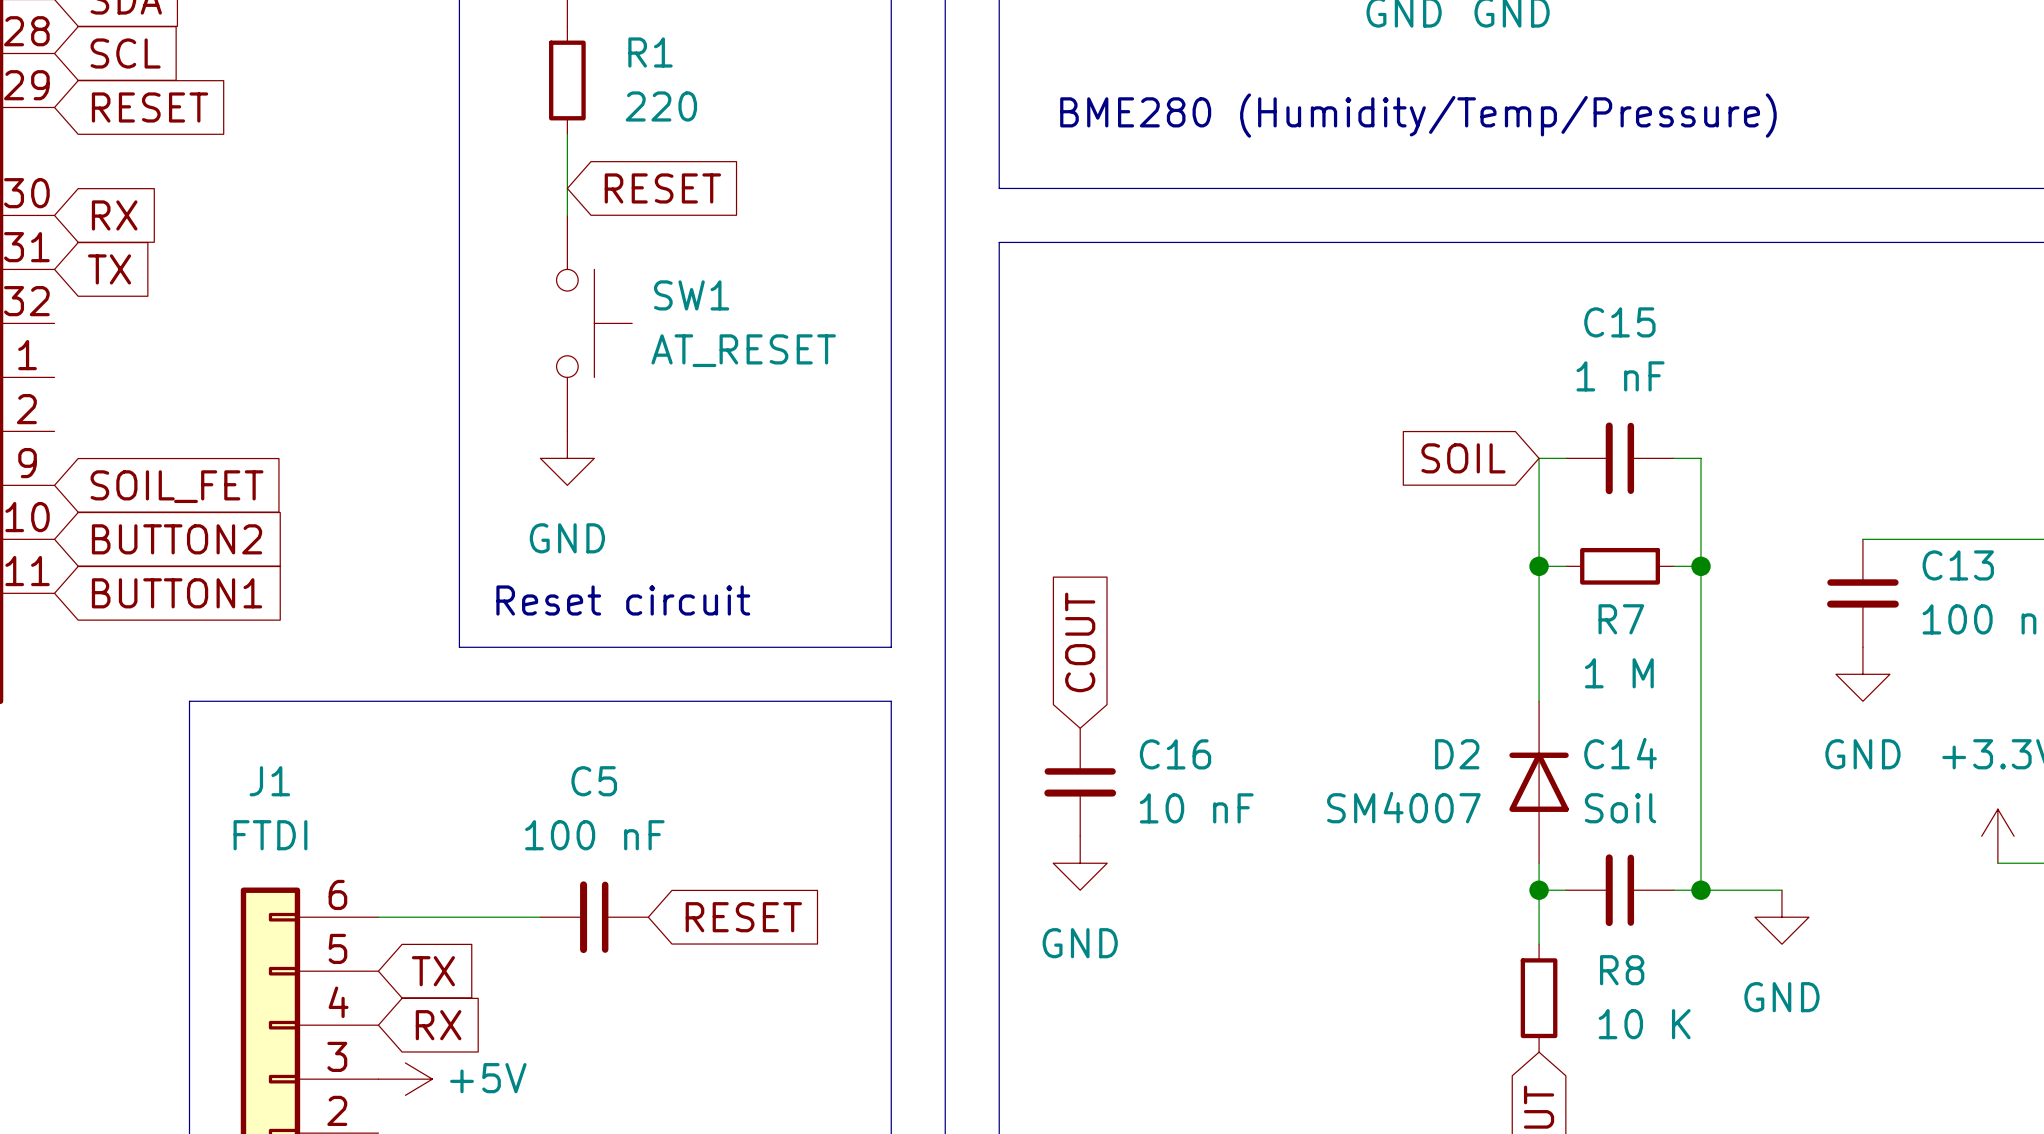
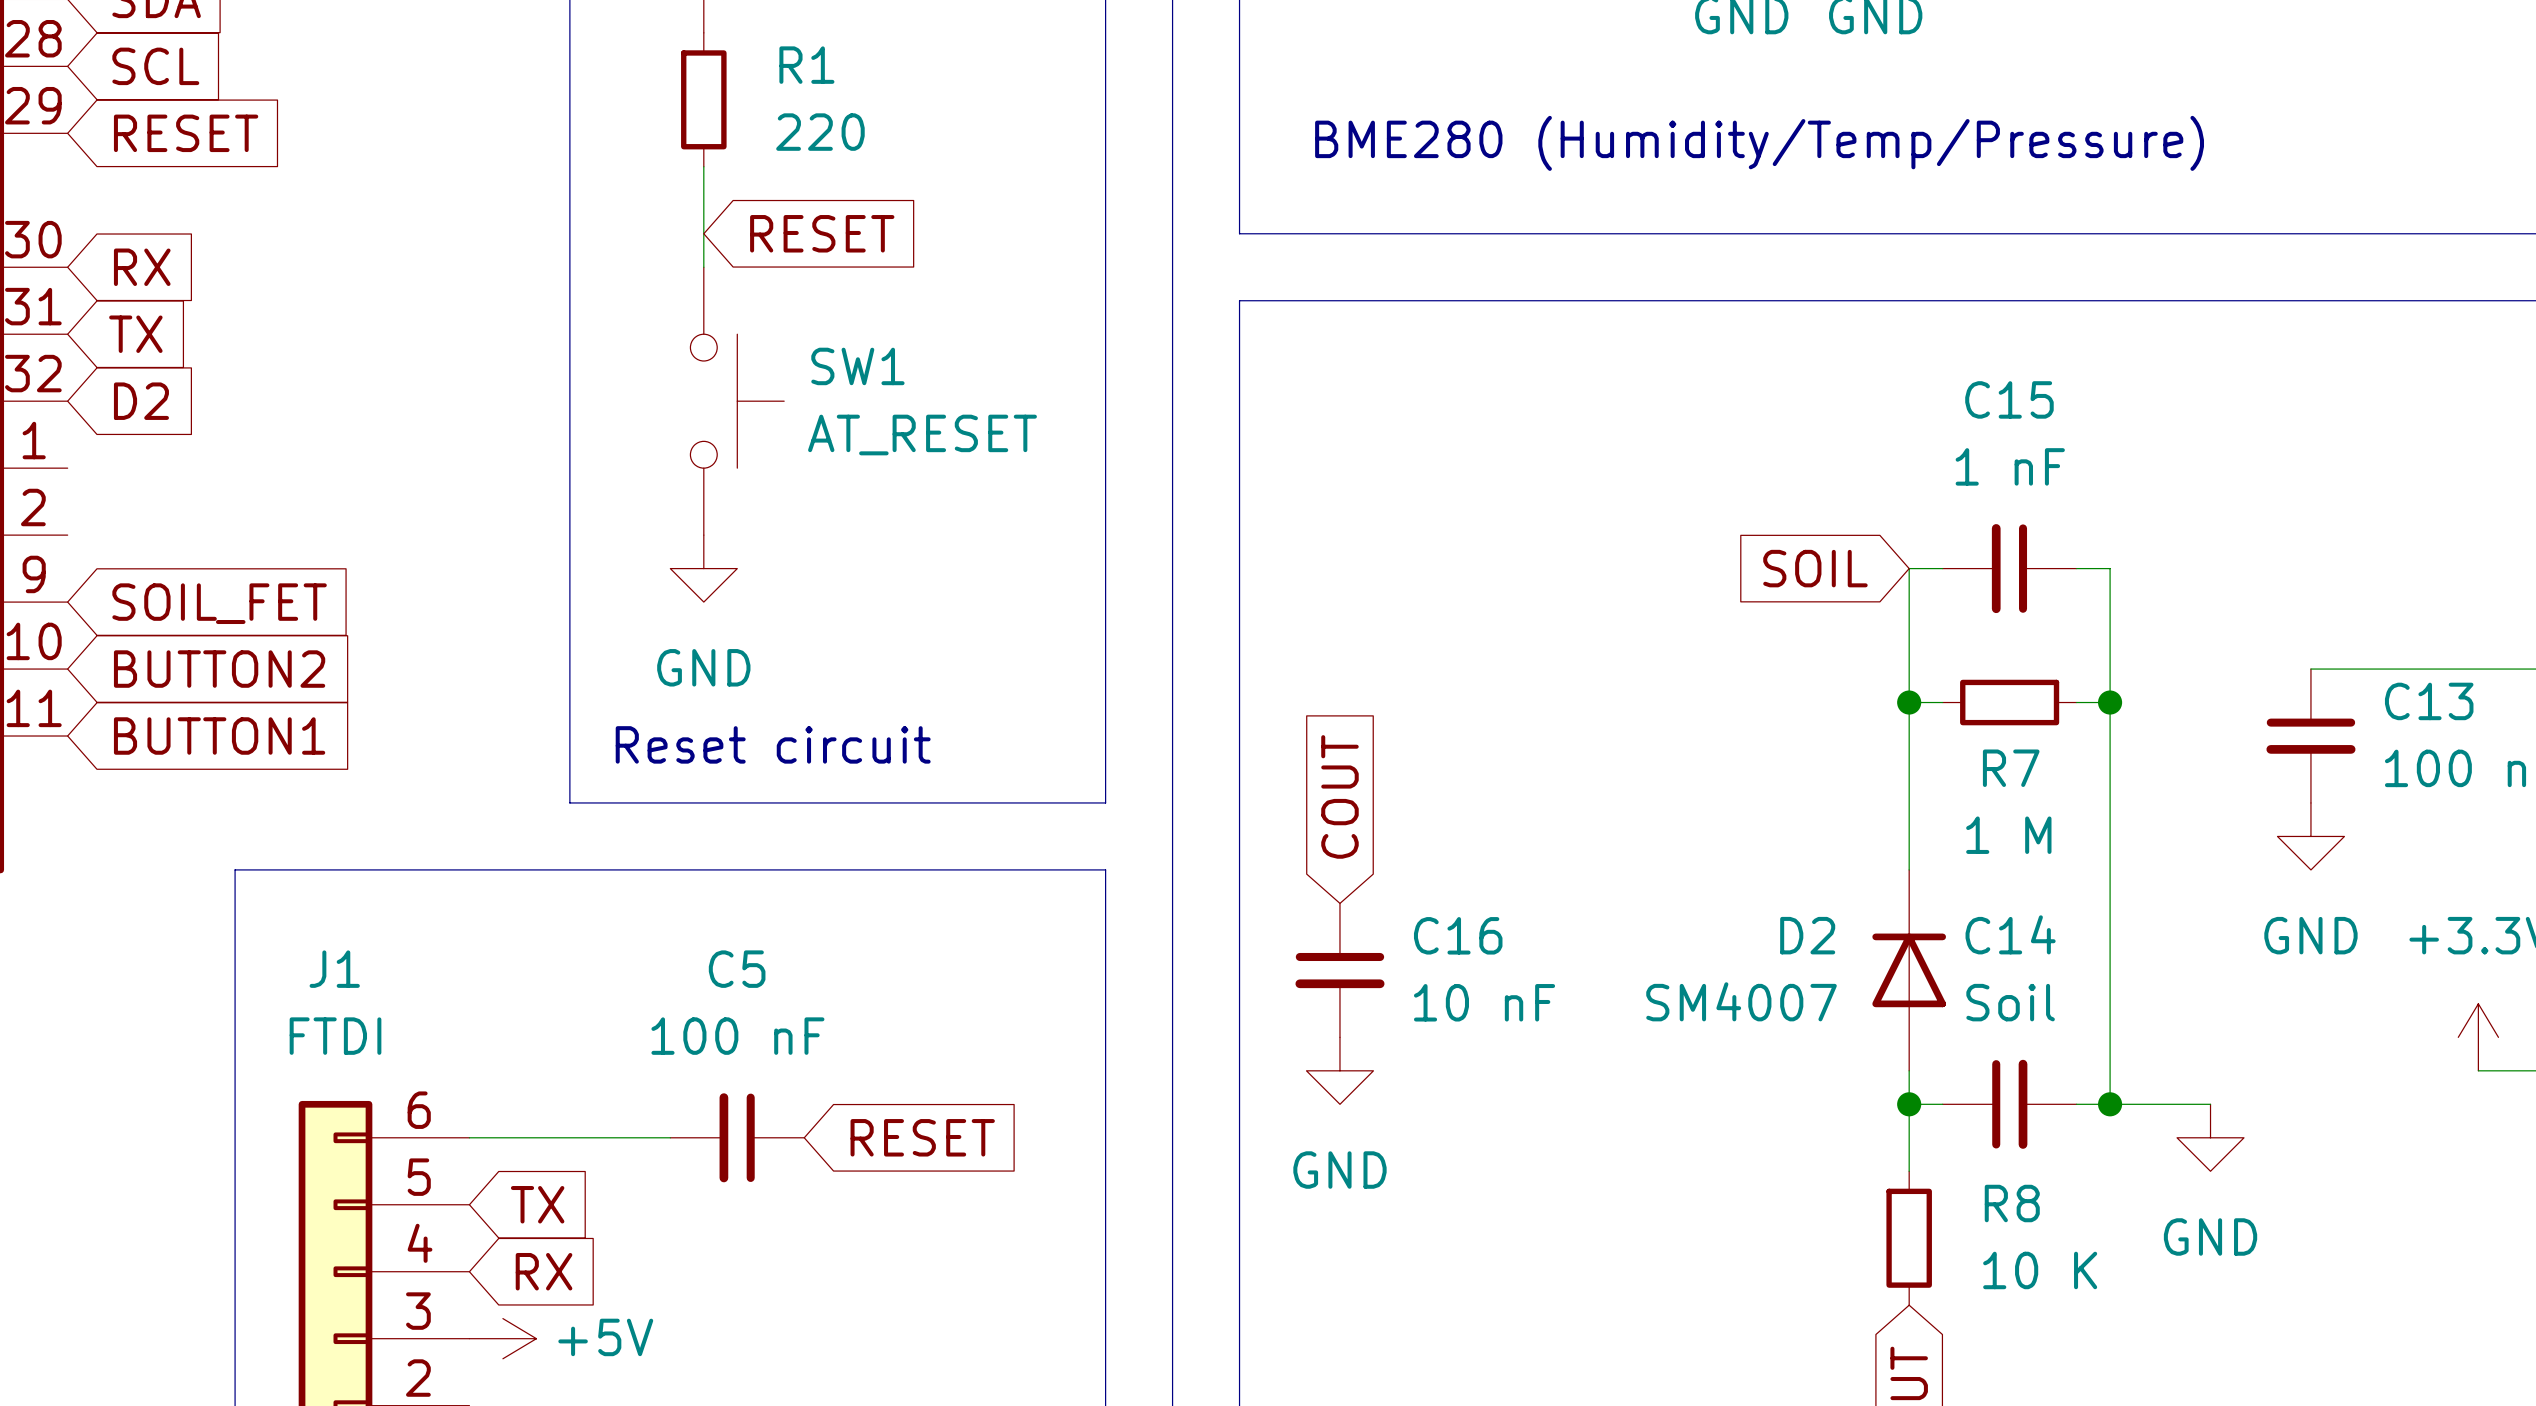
global label: none -> D2 (141, 401)
C14 rotation: 0° (1619, 890) -> 180° (2009, 1104)

